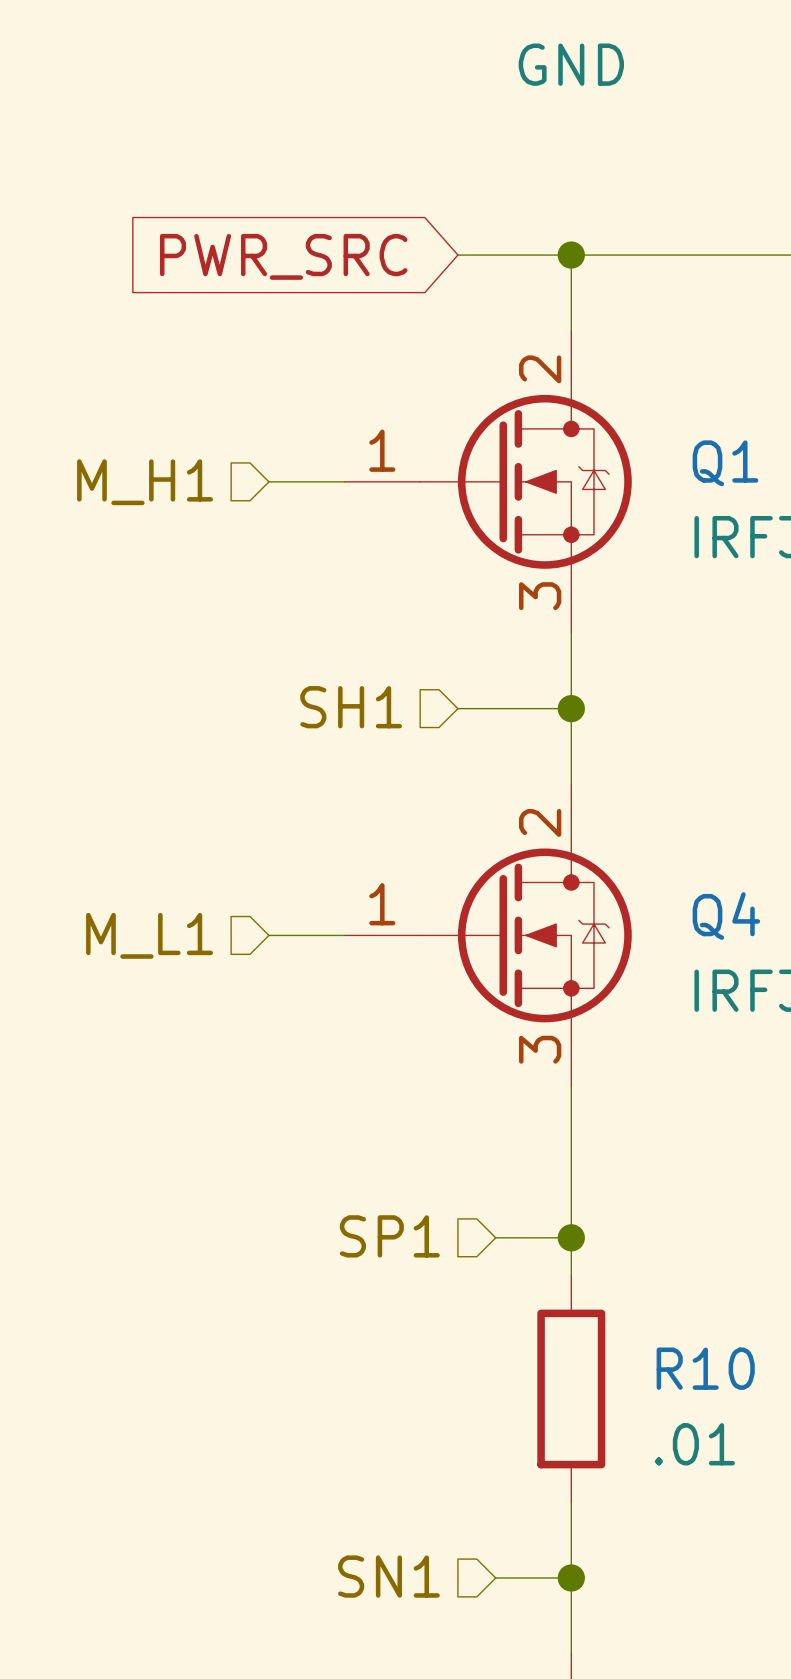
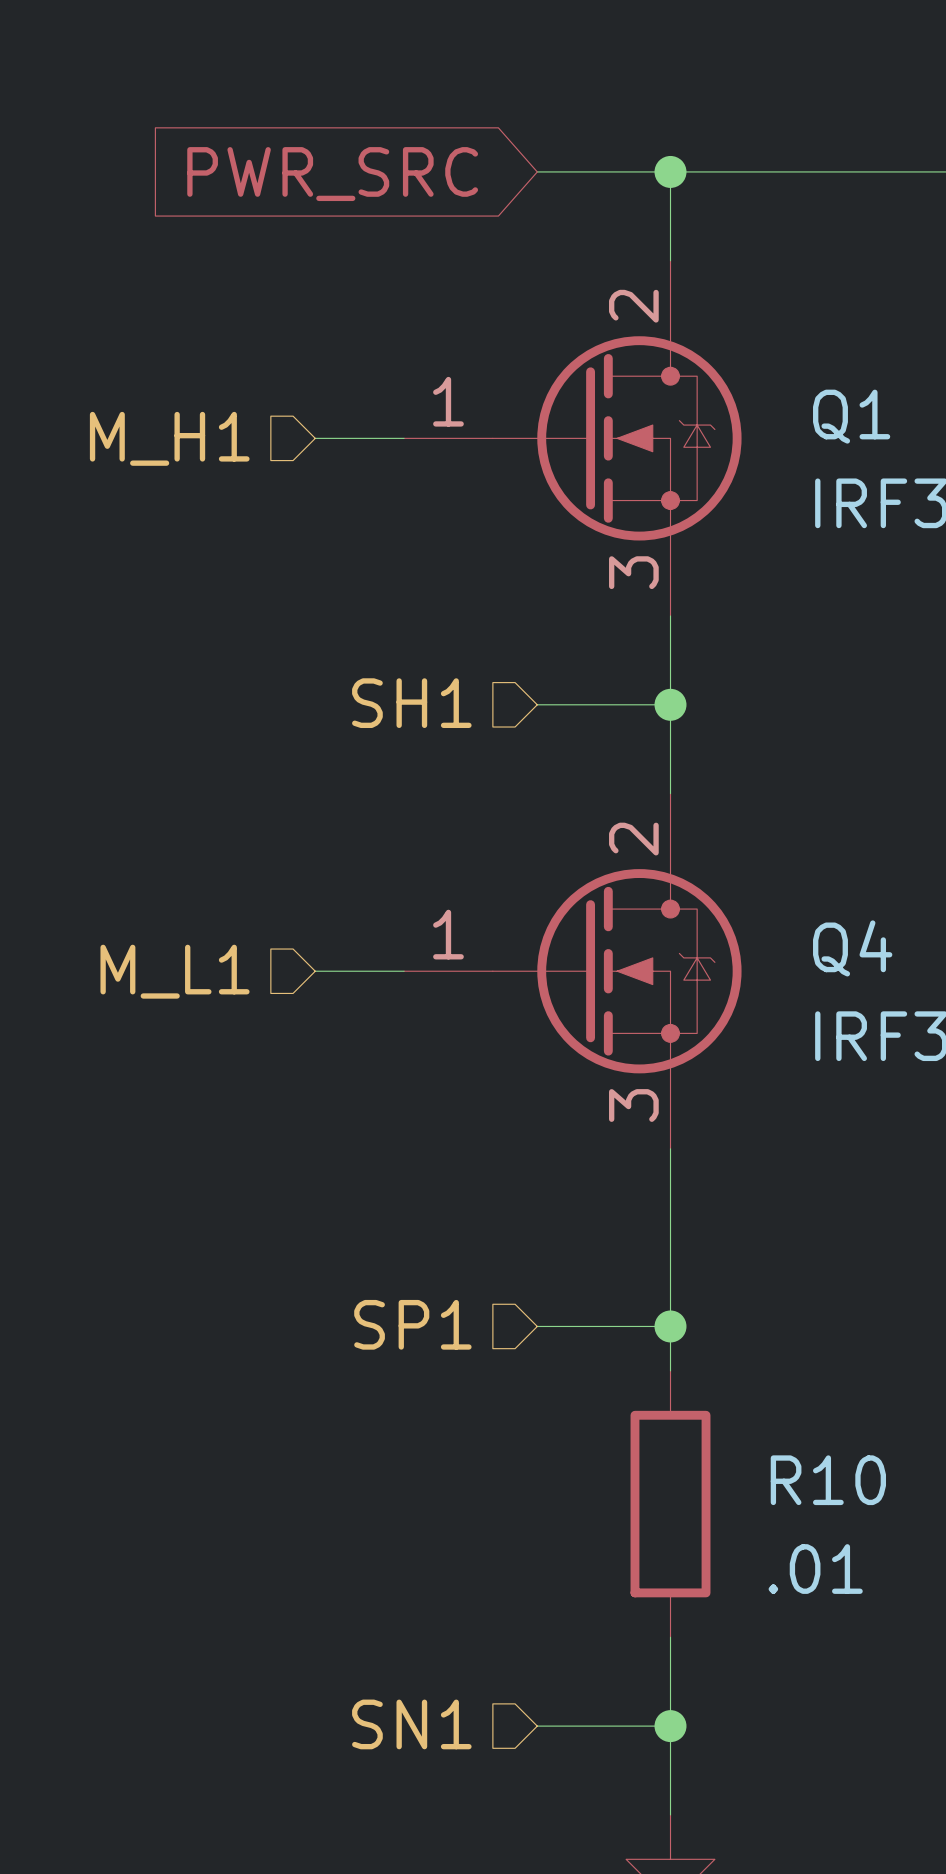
hierarchical label position: SP1 (389, 1236) -> SP1 (412, 1324)
wire: none -> (537, 1326) (581, 1326)
hierarchical label position: SN1 (388, 1576) -> SN1 (411, 1724)
wire: none -> (537, 1726) (581, 1726)

